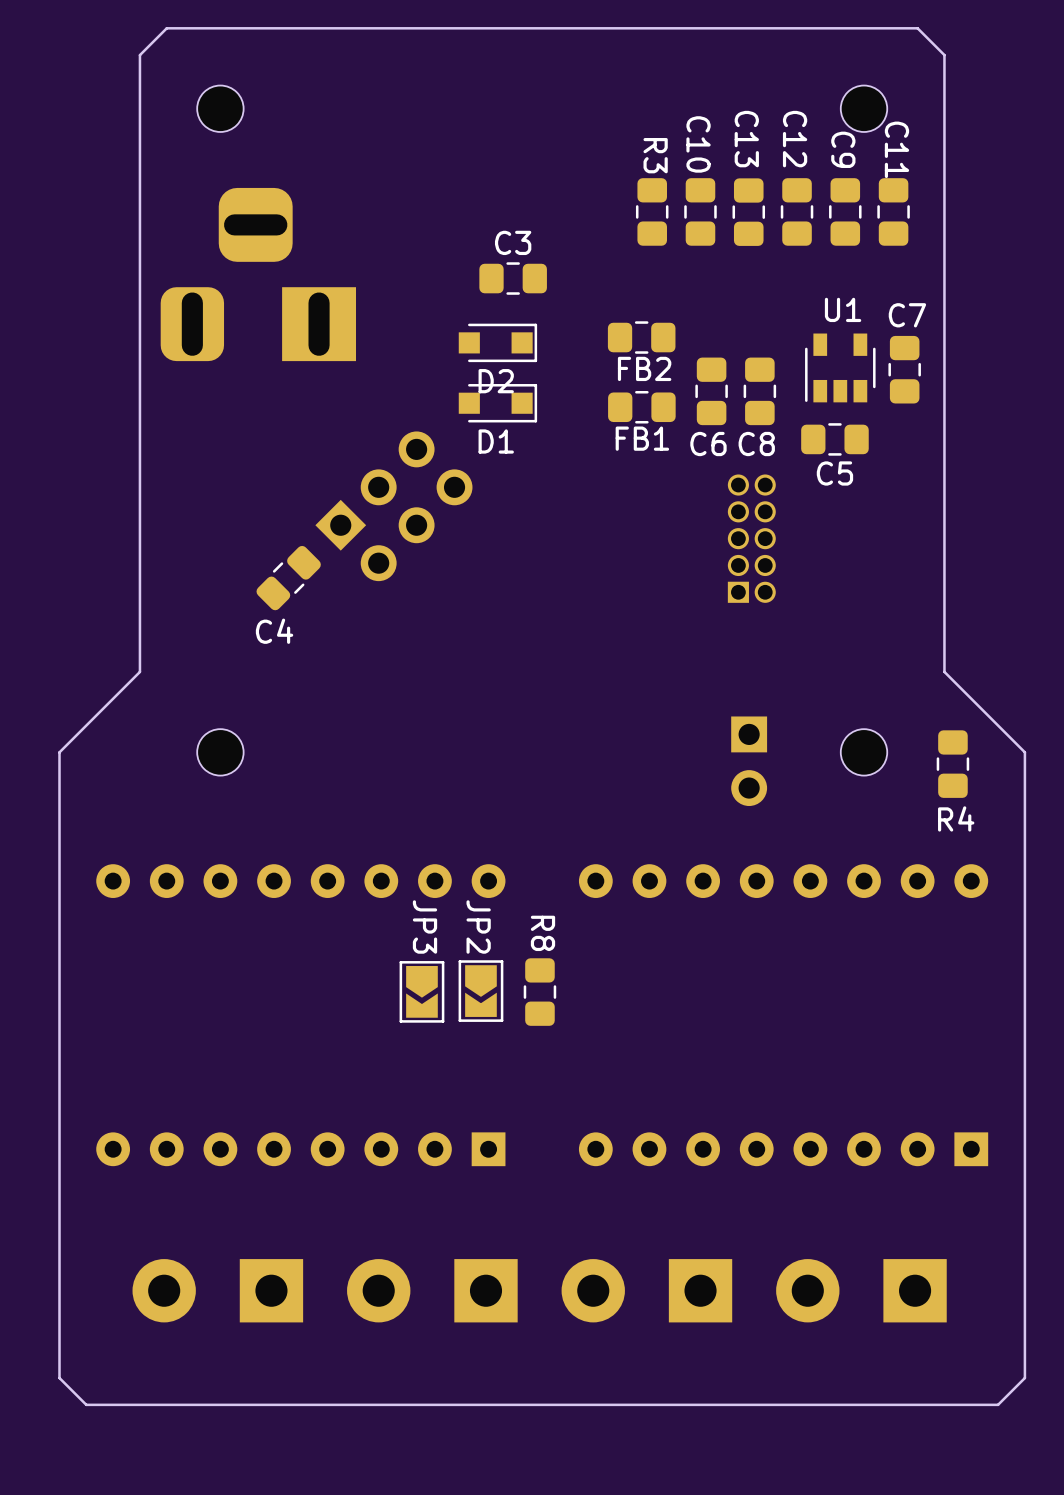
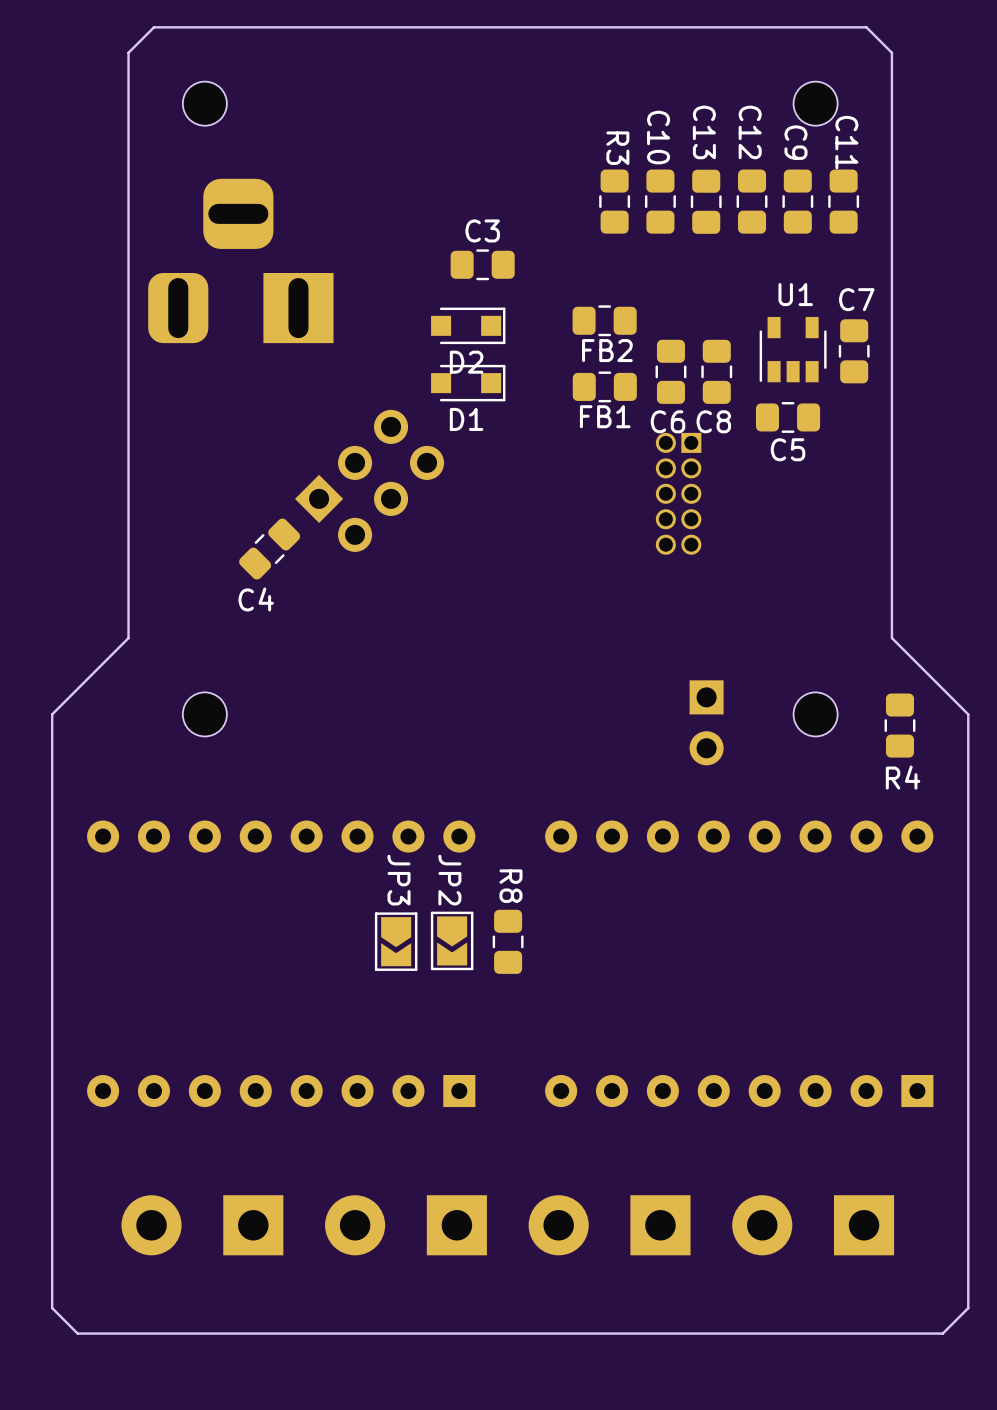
part rotation: 0° (751, 538) -> 180° (678, 493)

